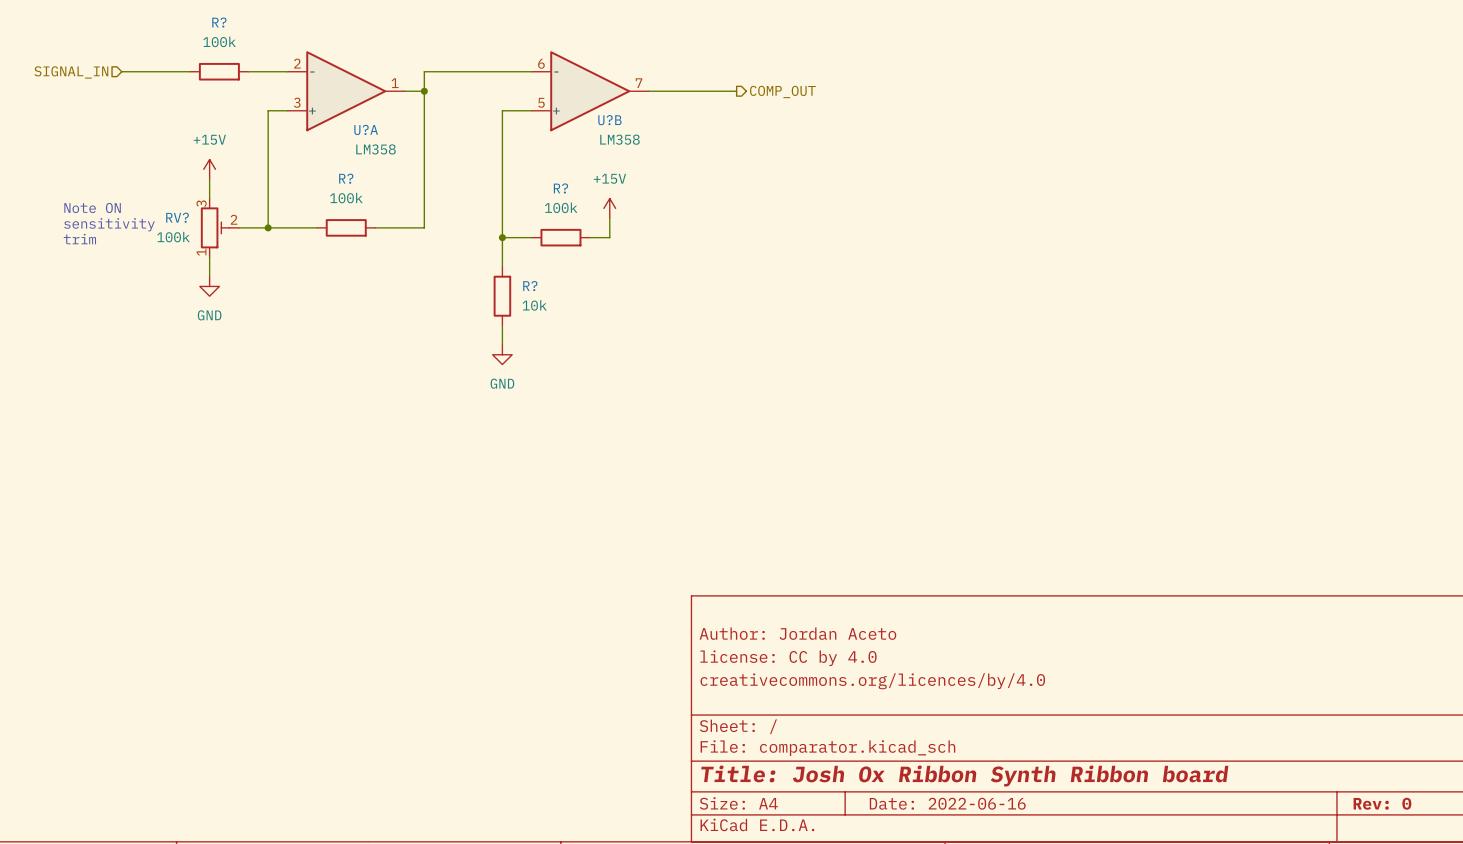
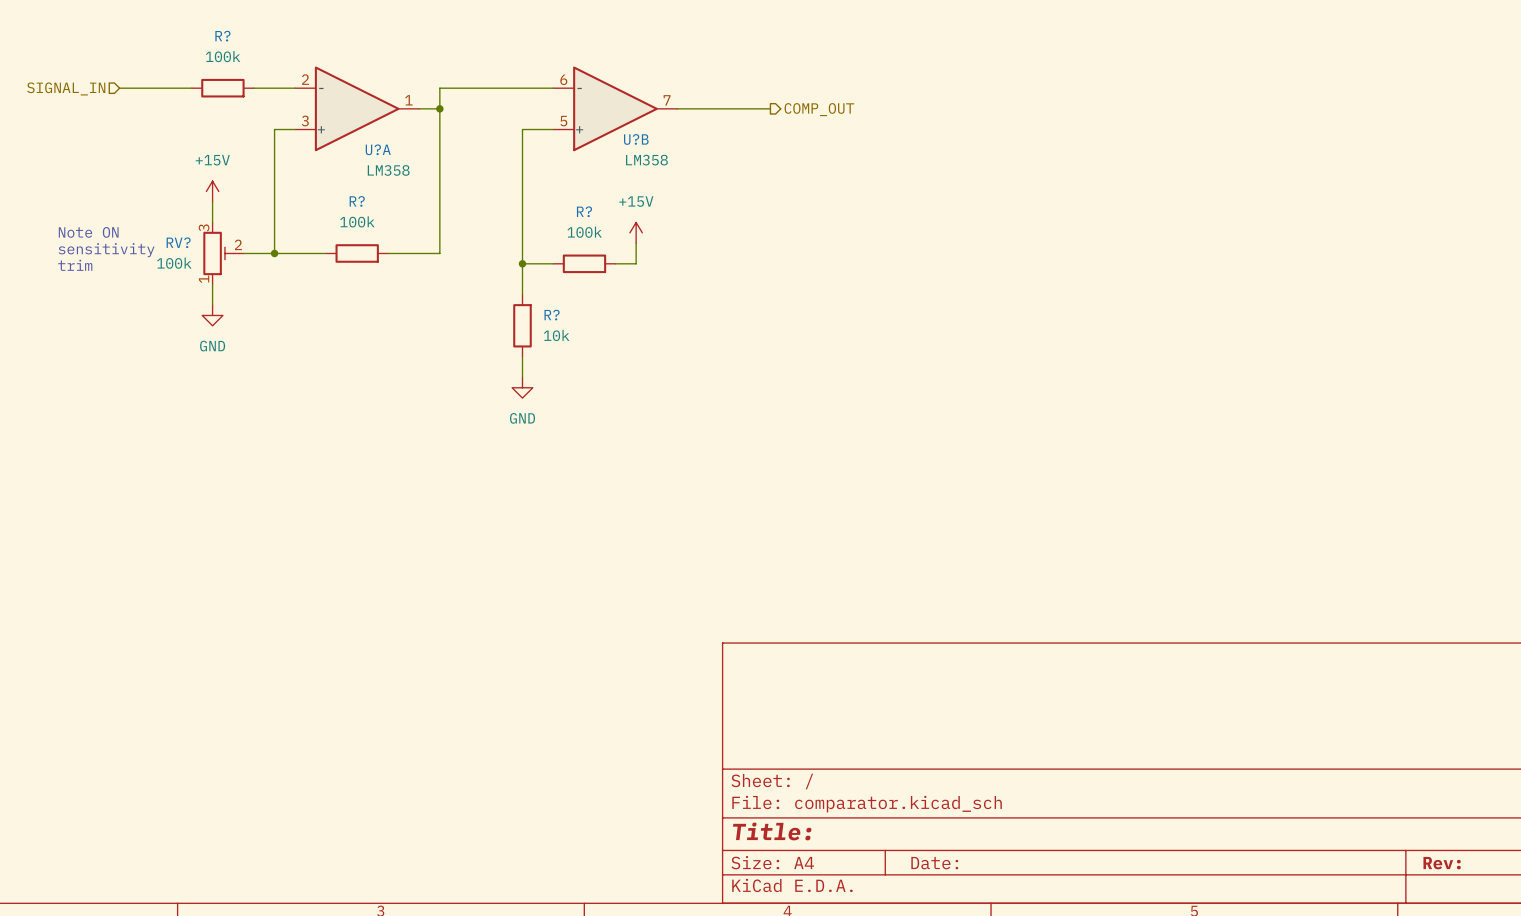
title block: Author: Jordan Aceto (797, 633) -> none
title block: license: CC by 4.0 (788, 658) -> none
title block: creativecommons.org/licences/by/4.0 (872, 681) -> none
title block: Title: Josh Ox Ribbon Synth Ribbon board (964, 776) -> Title: (772, 831)
title block: Date: 2022-06-16 (947, 803) -> Date: (934, 863)
title block: Rev: 0 (1382, 803) -> Rev: (1442, 863)

